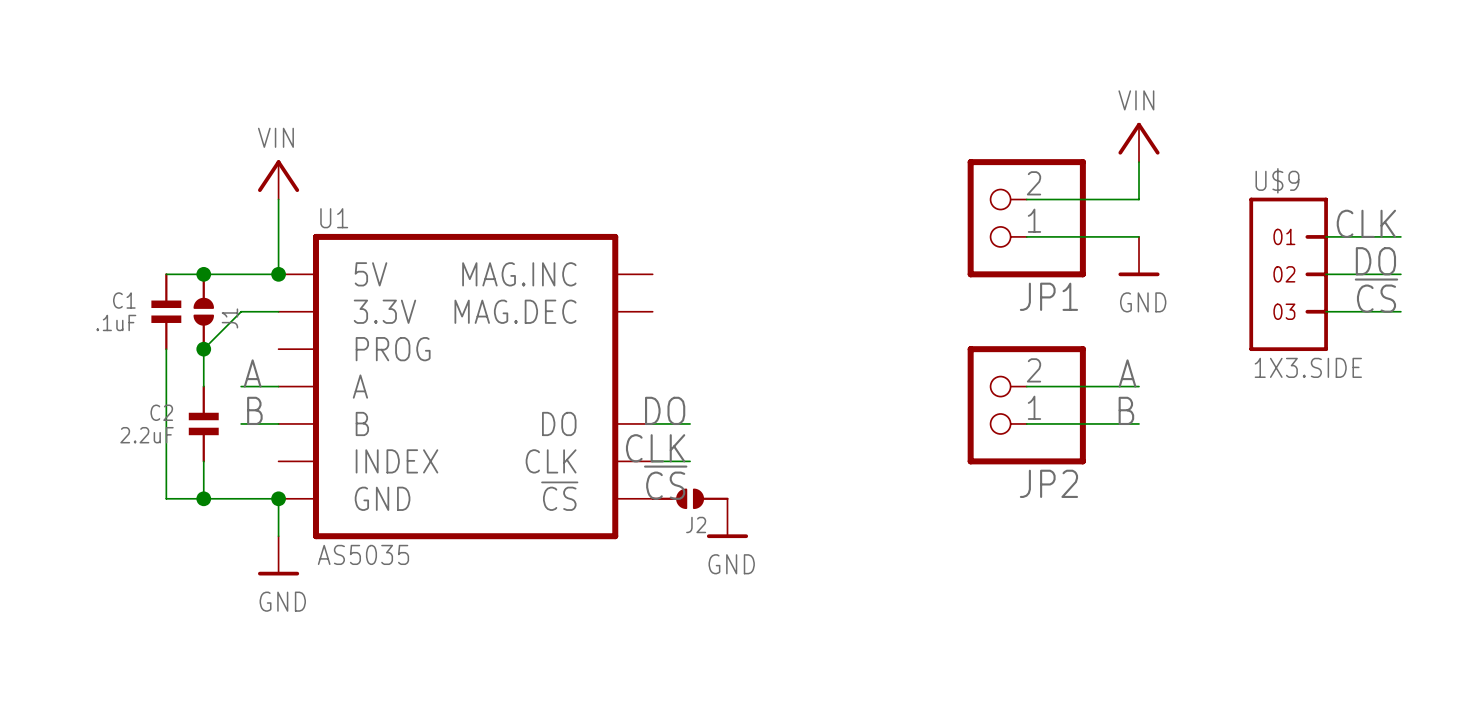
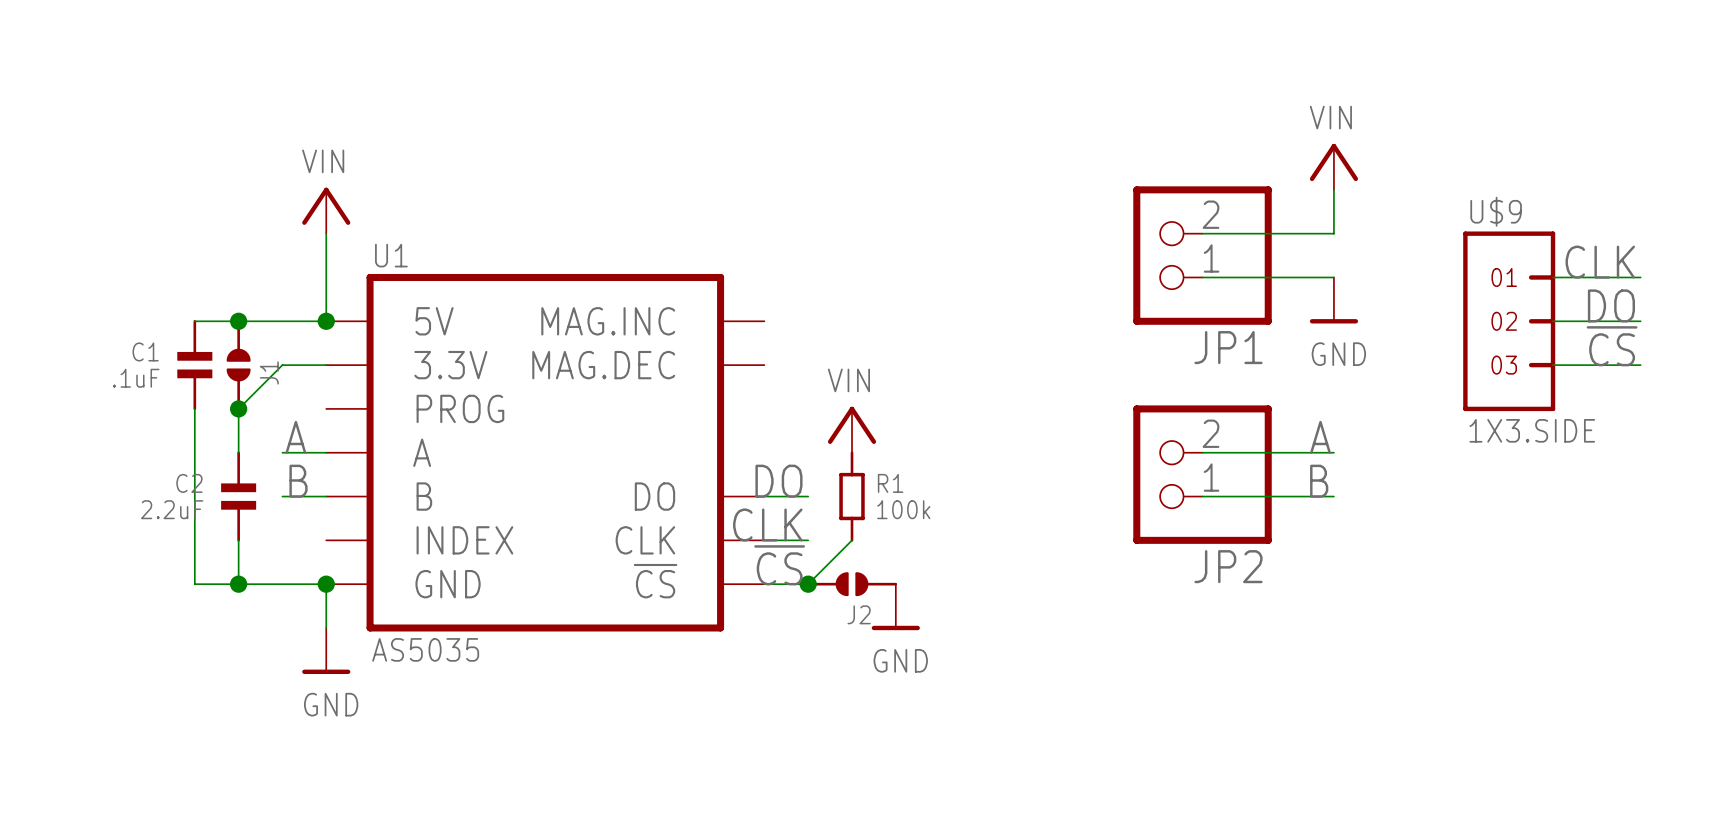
power symbol: none -> VIN (852, 429)
R1: none -> 100k (852, 496)
wire: none -> (852, 540) (808, 584) (764, 584)
J2 position: (690, 498) -> (852, 584)
junction: none -> (808, 584)
power symbol position: GND (727, 518) -> GND (895, 607)

